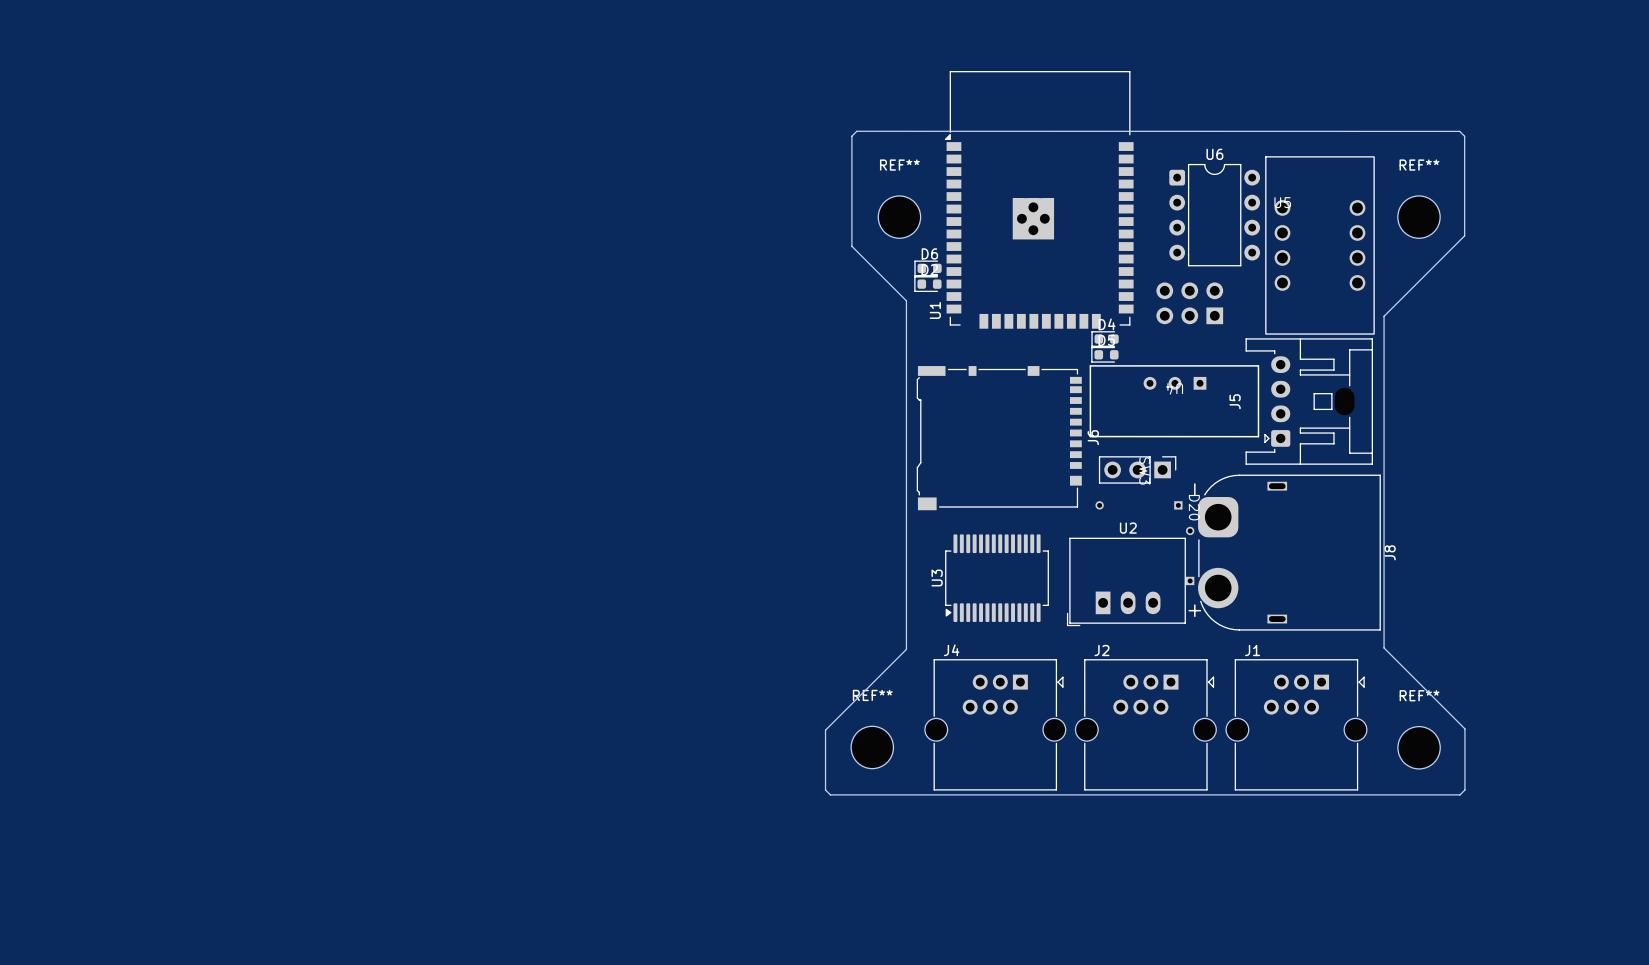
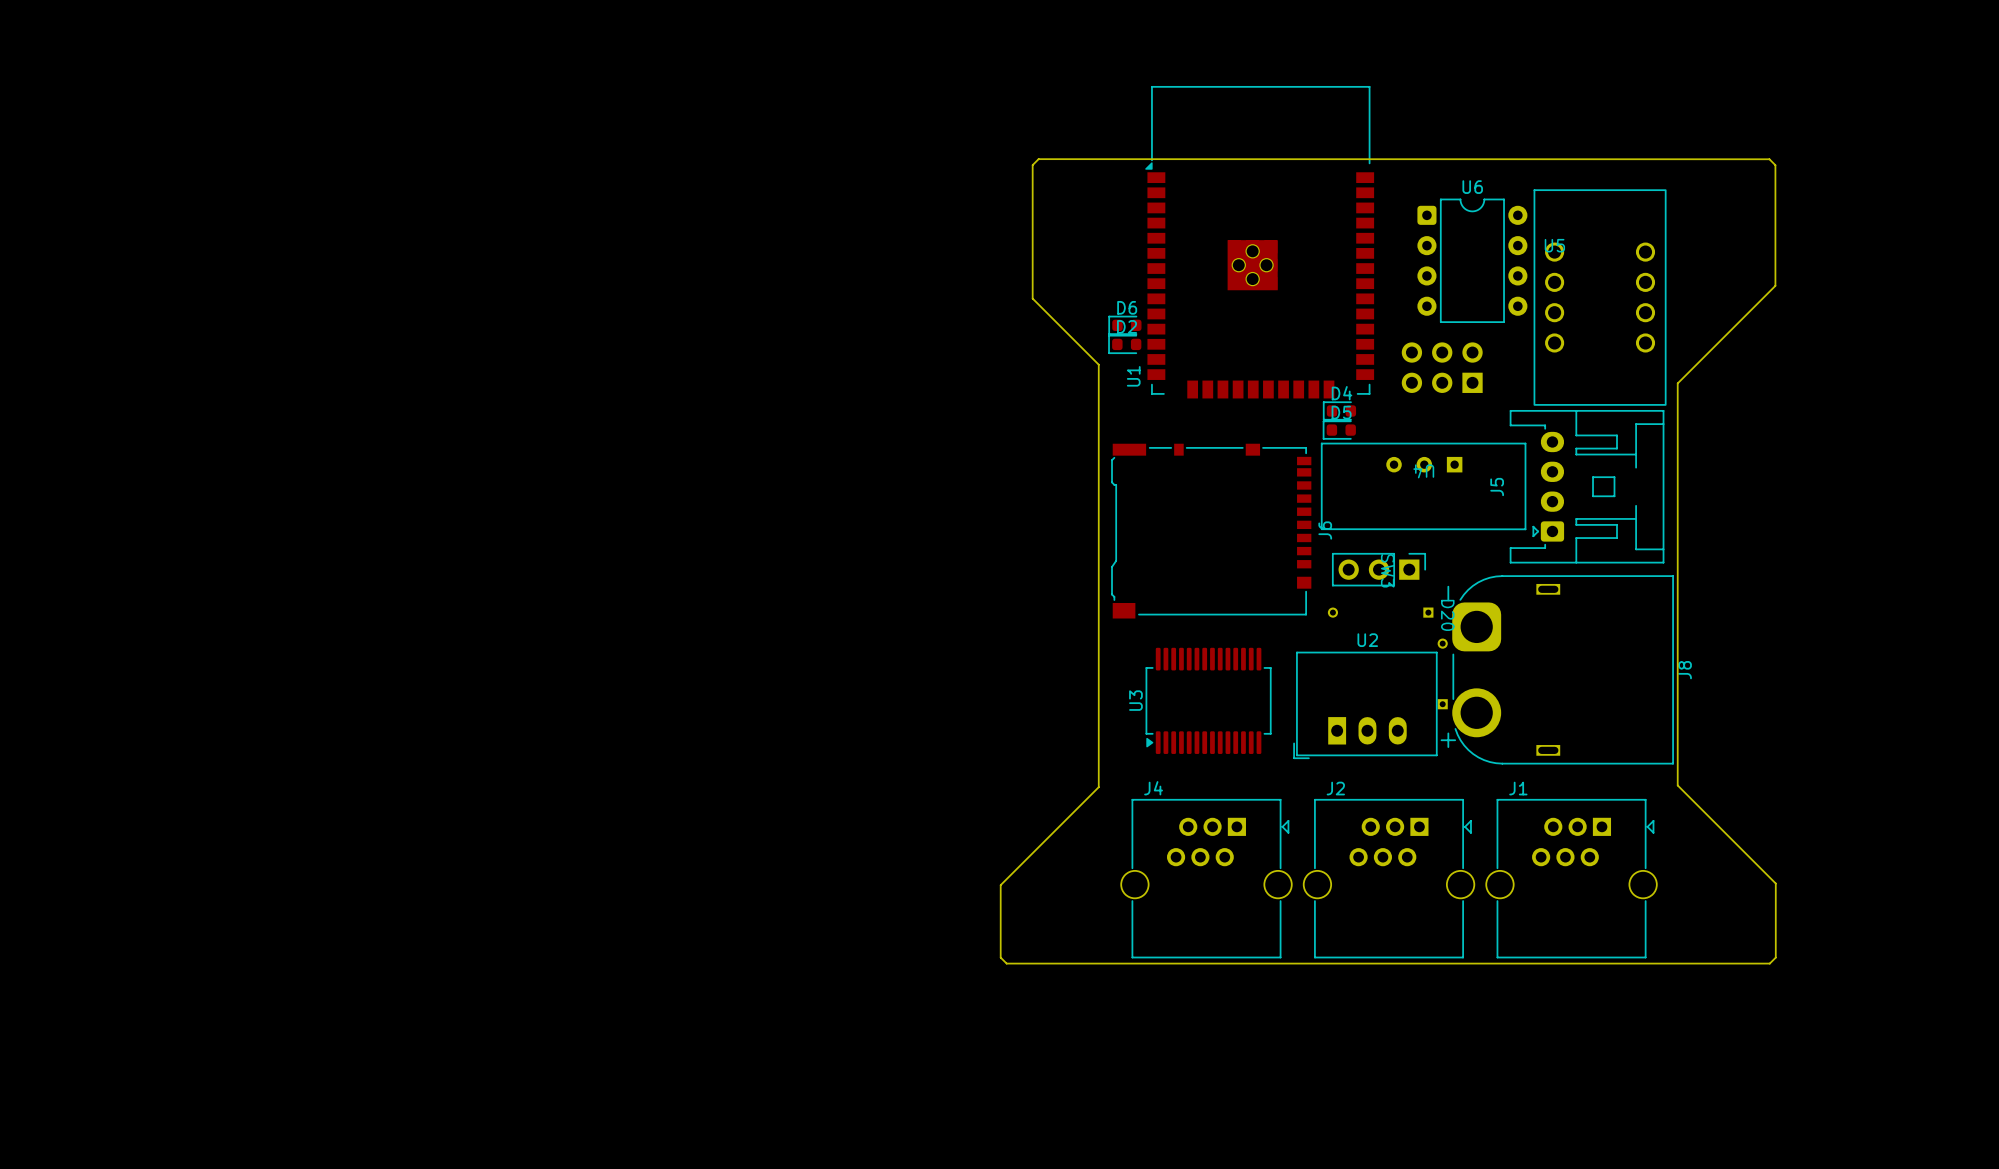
REF**: (899, 217) -> none
REF**: (1418, 217) -> none
REF**: (872, 747) -> none
REF**: (1419, 747) -> none

